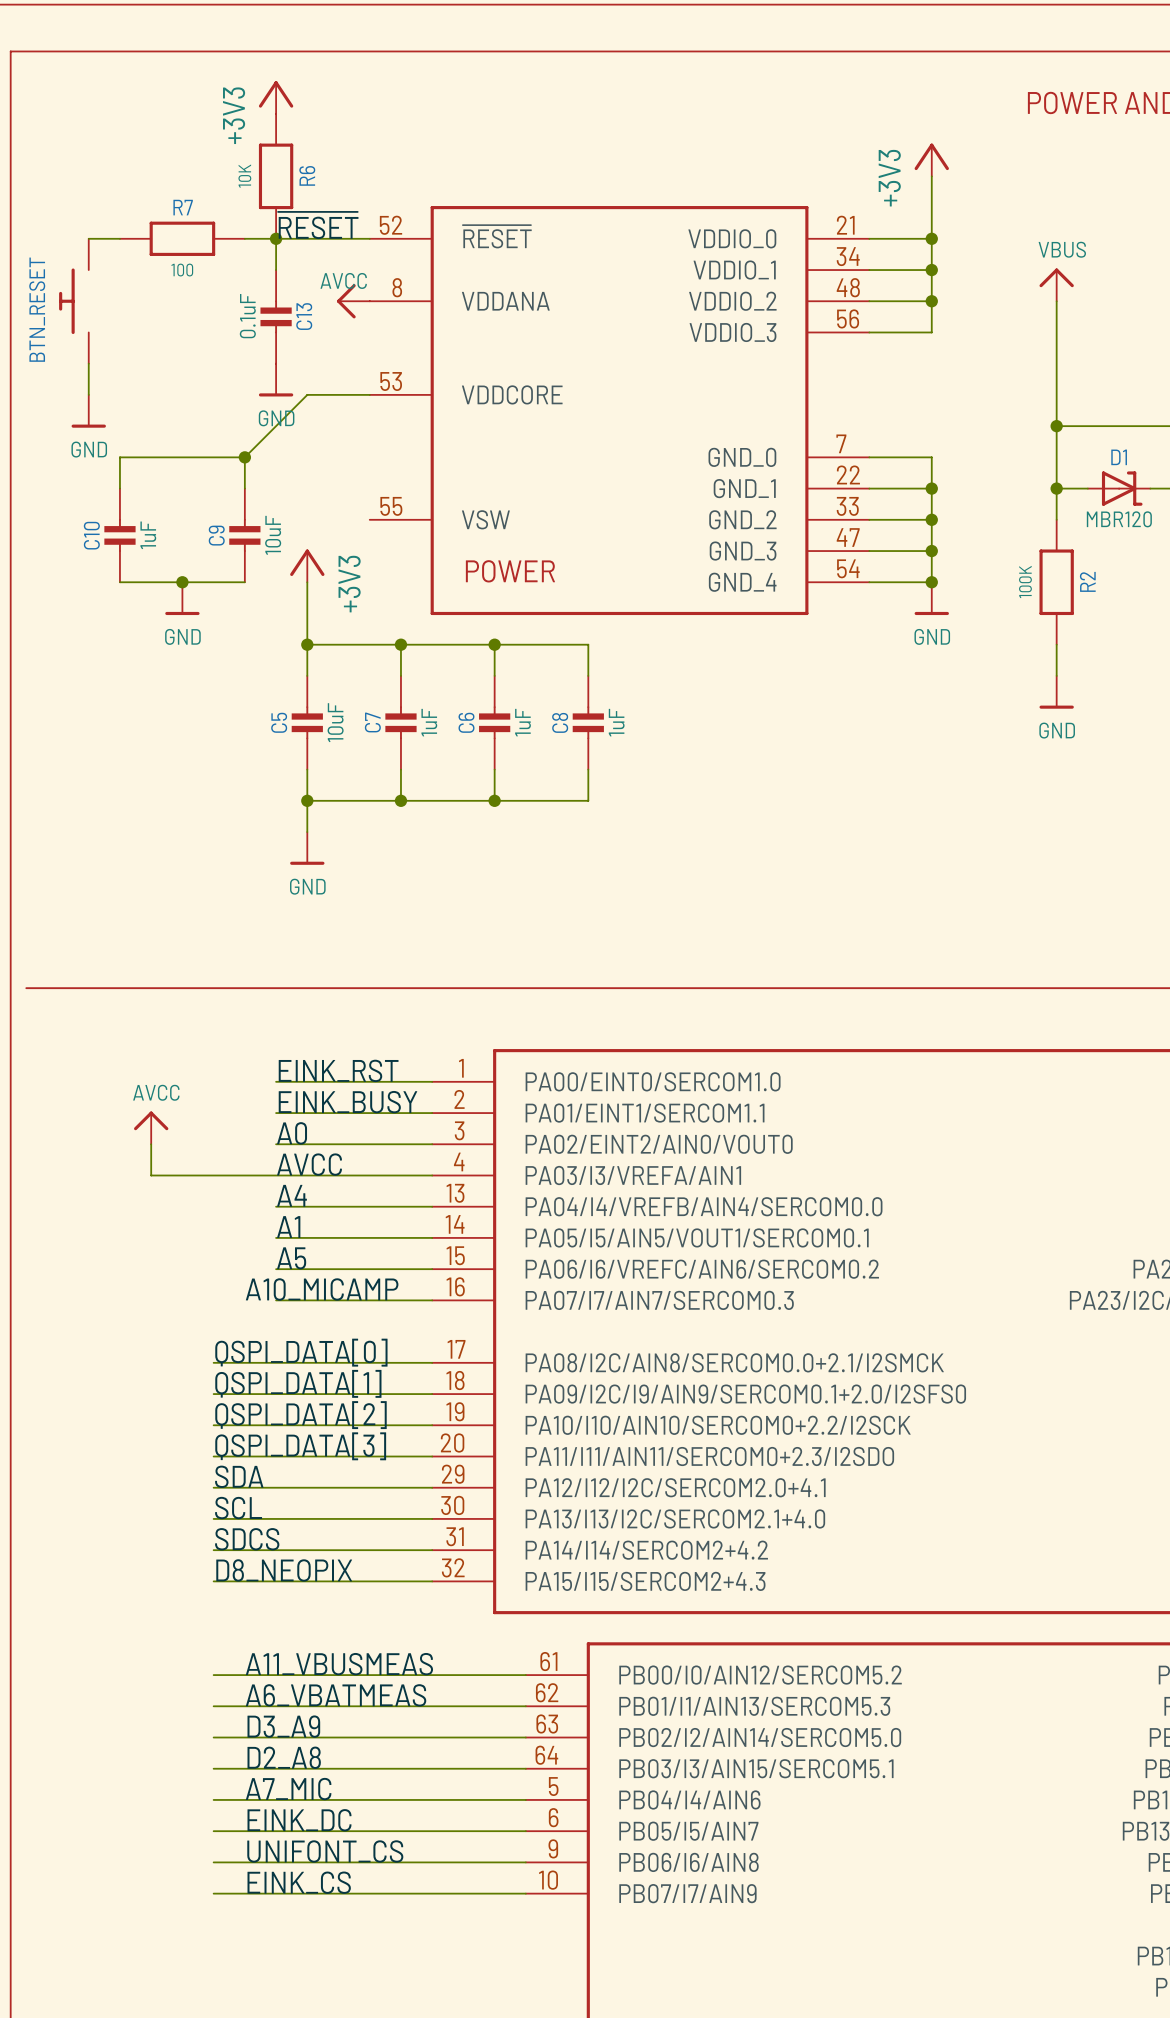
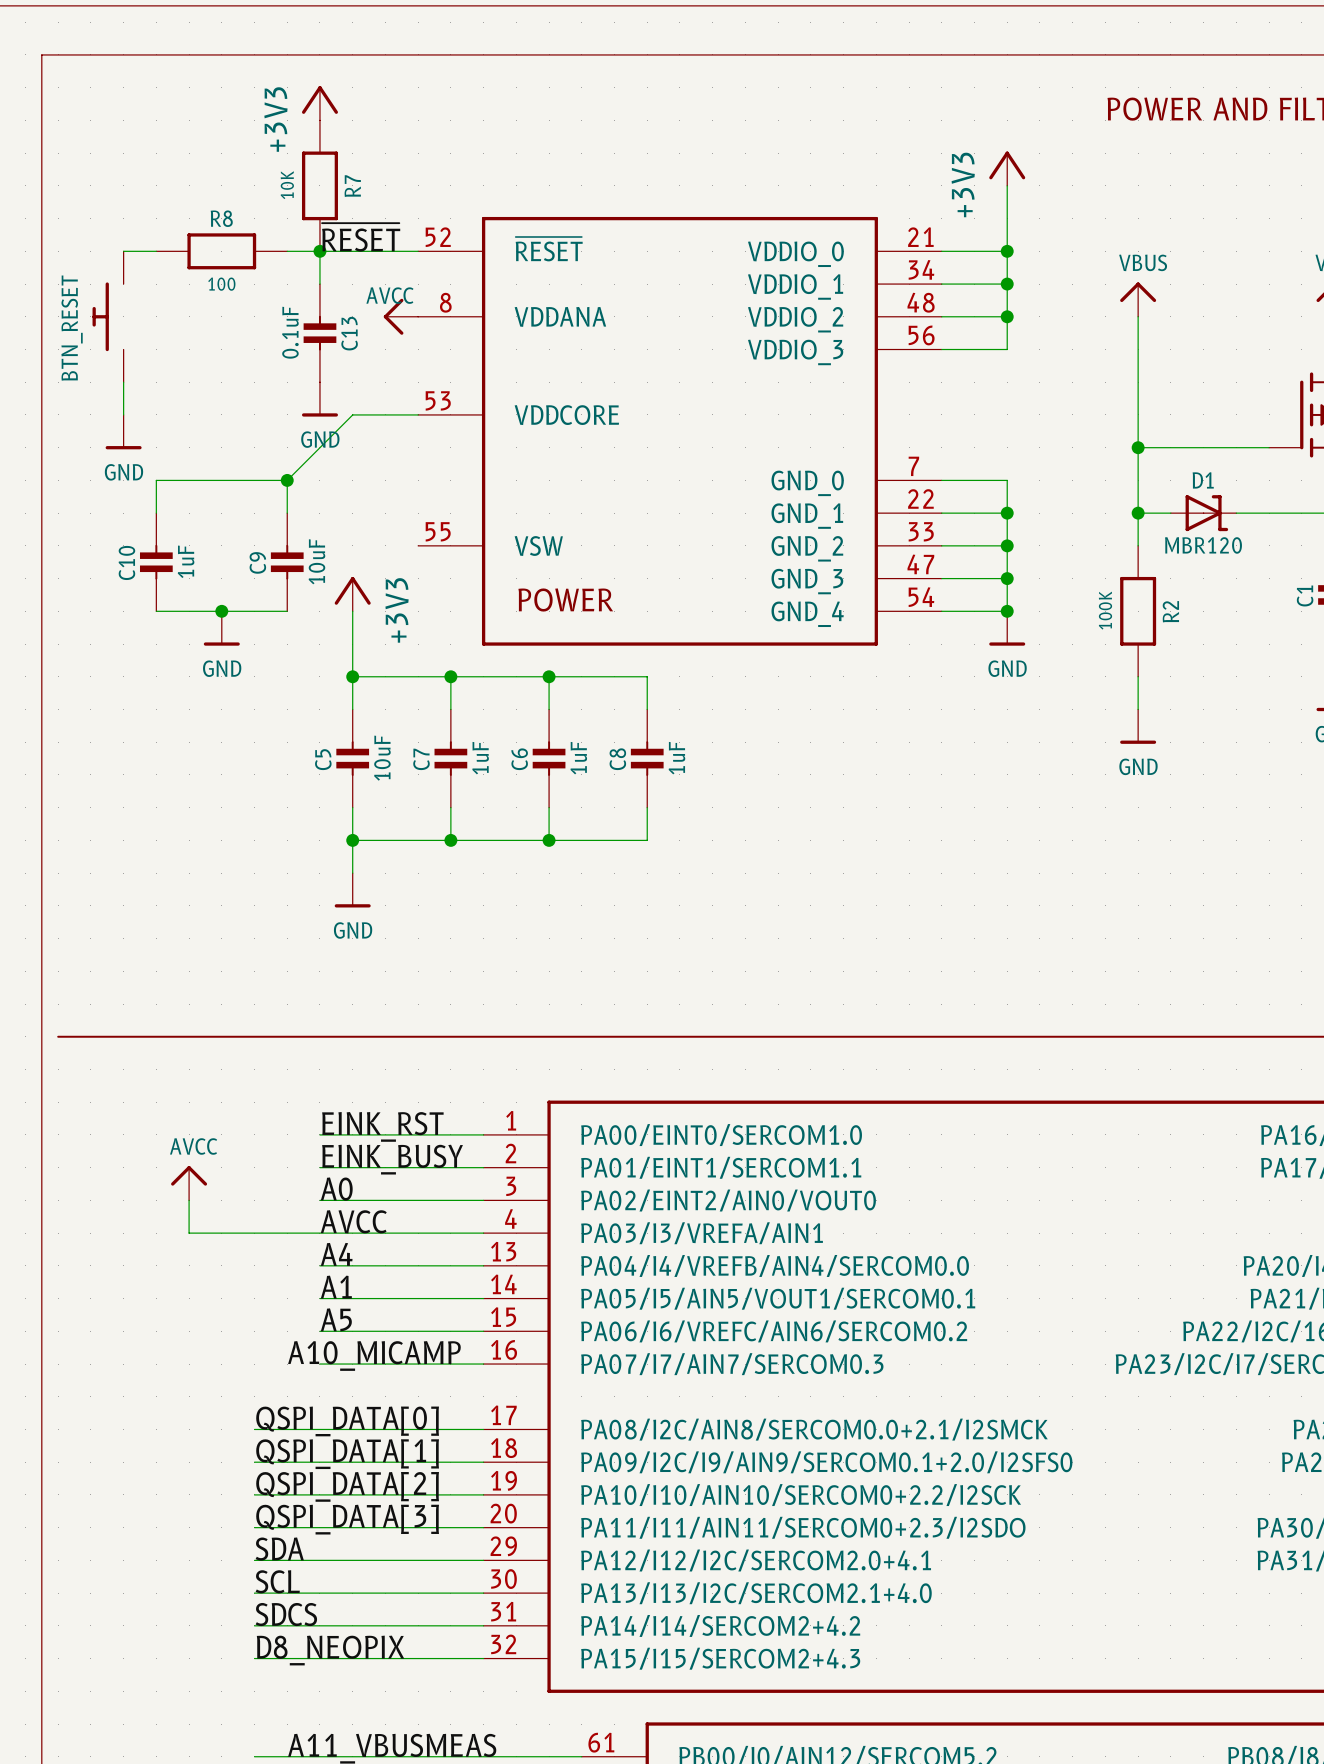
R6 name: R6 (307, 175) -> R7 (352, 186)
R7 name: R7 (183, 207) -> R8 (221, 218)

